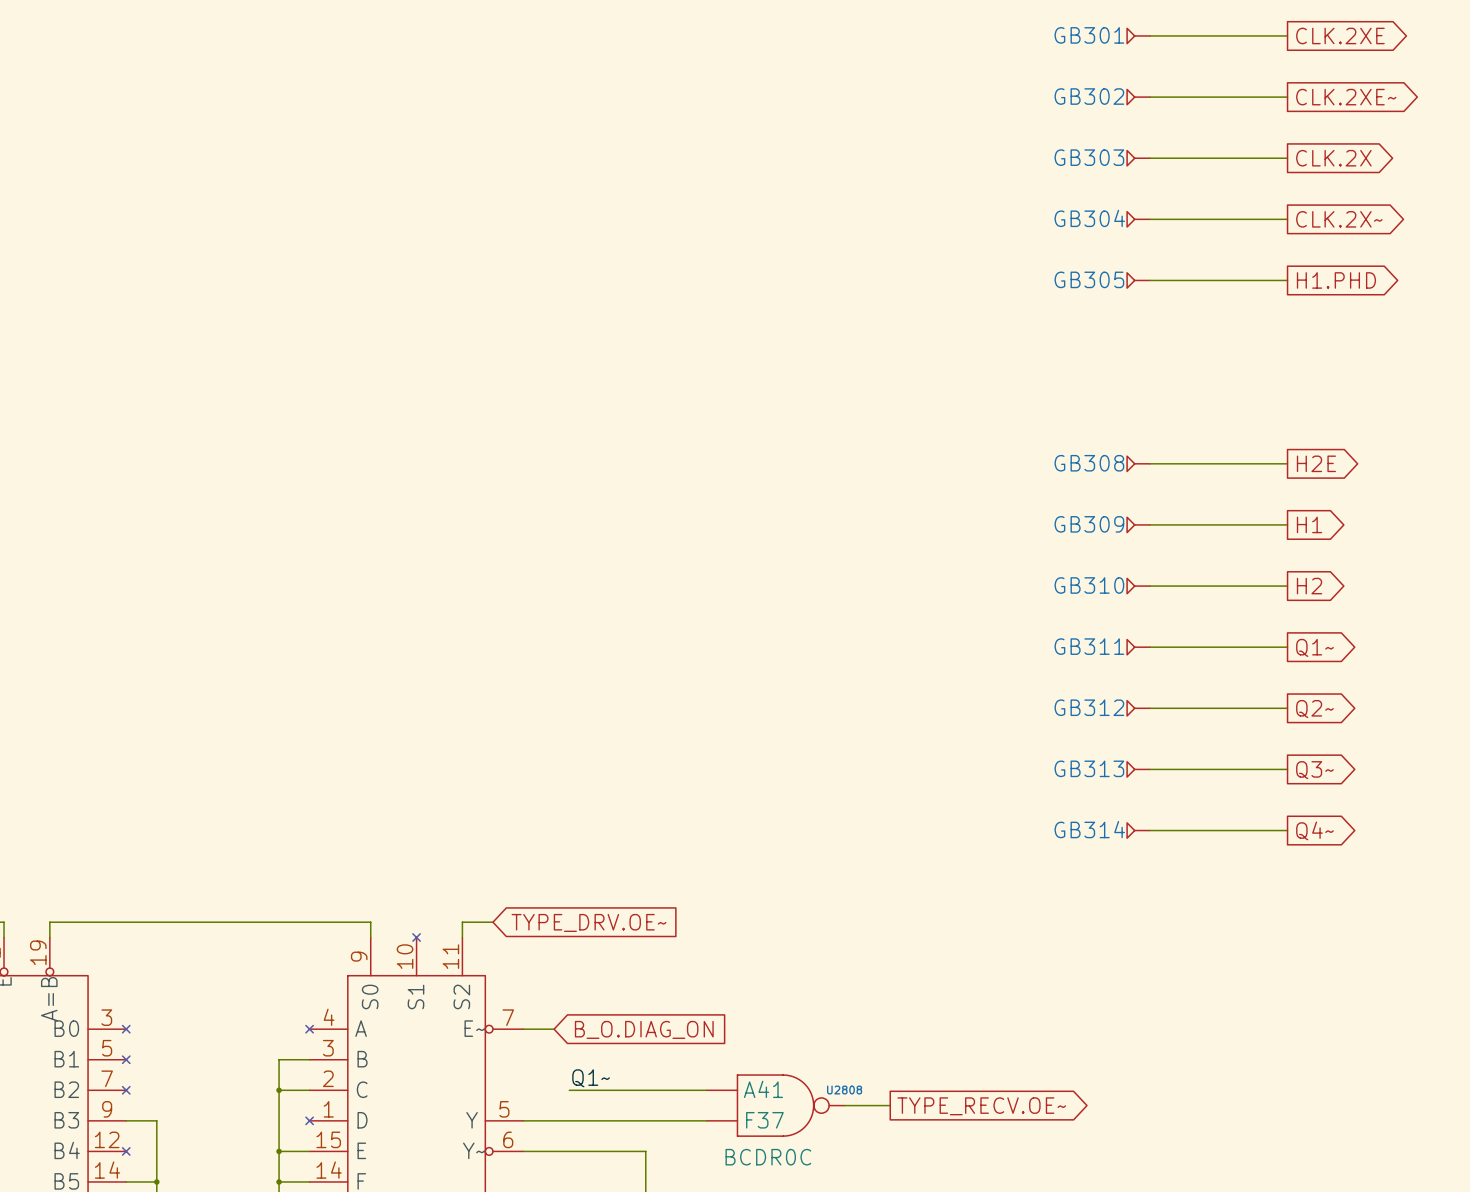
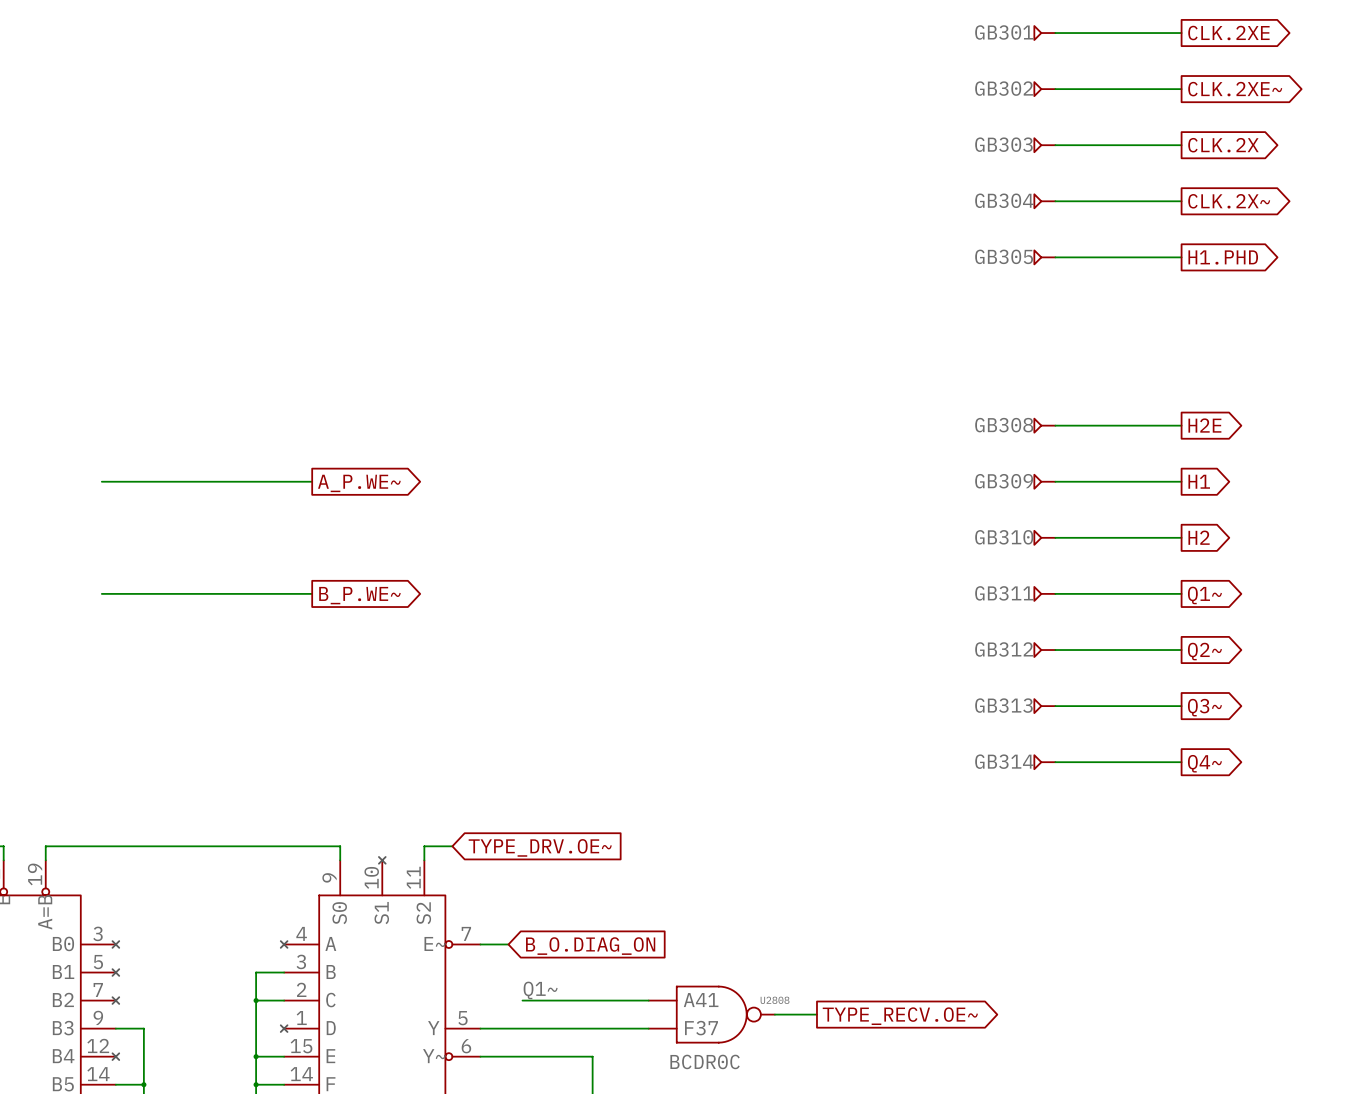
wire: none -> (101, 481) (312, 481)
global label: none -> A_P.WE~ (359, 483)
wire: none -> (101, 593) (312, 593)
global label: none -> B_P.WE~ (359, 595)

